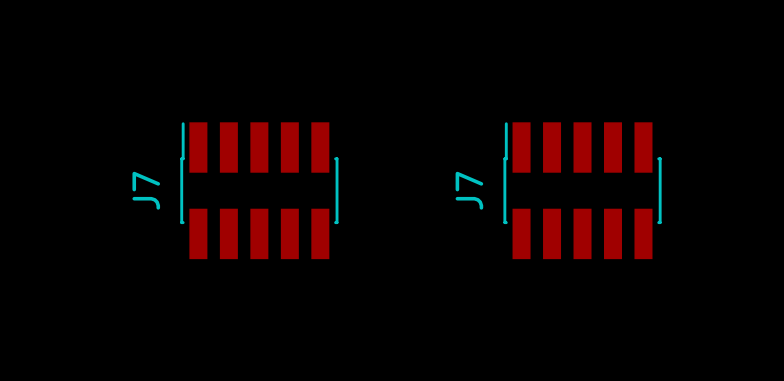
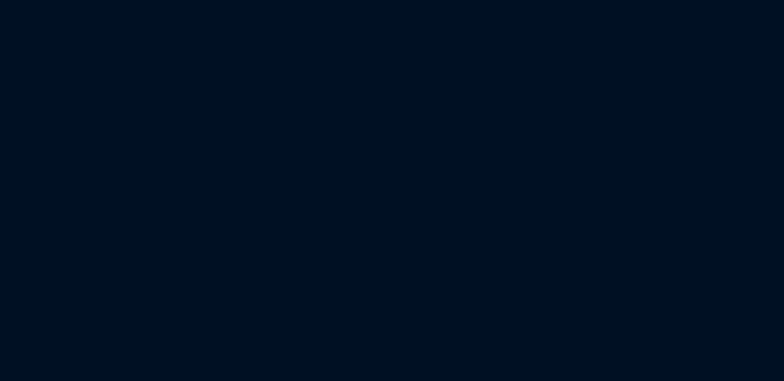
J7: (259, 190) -> none
J7: (582, 190) -> none

